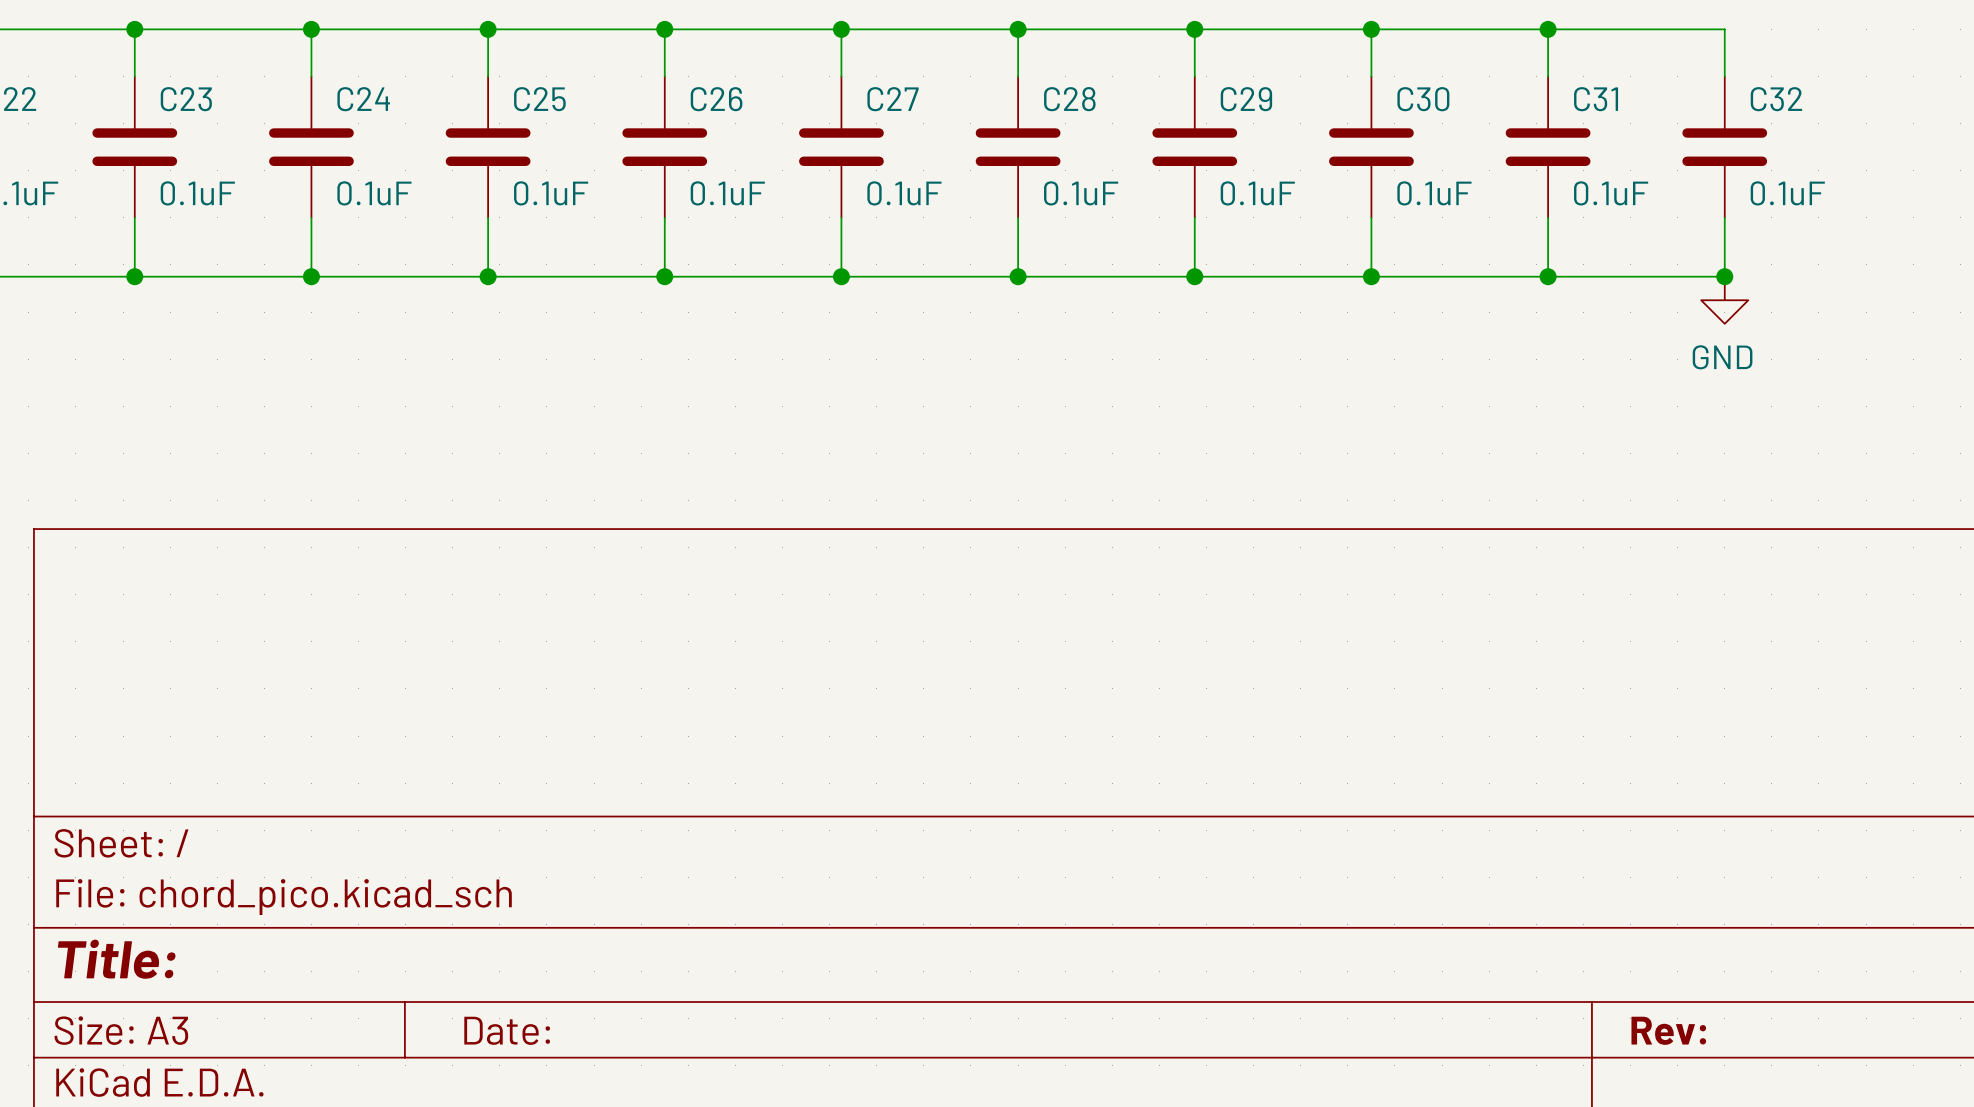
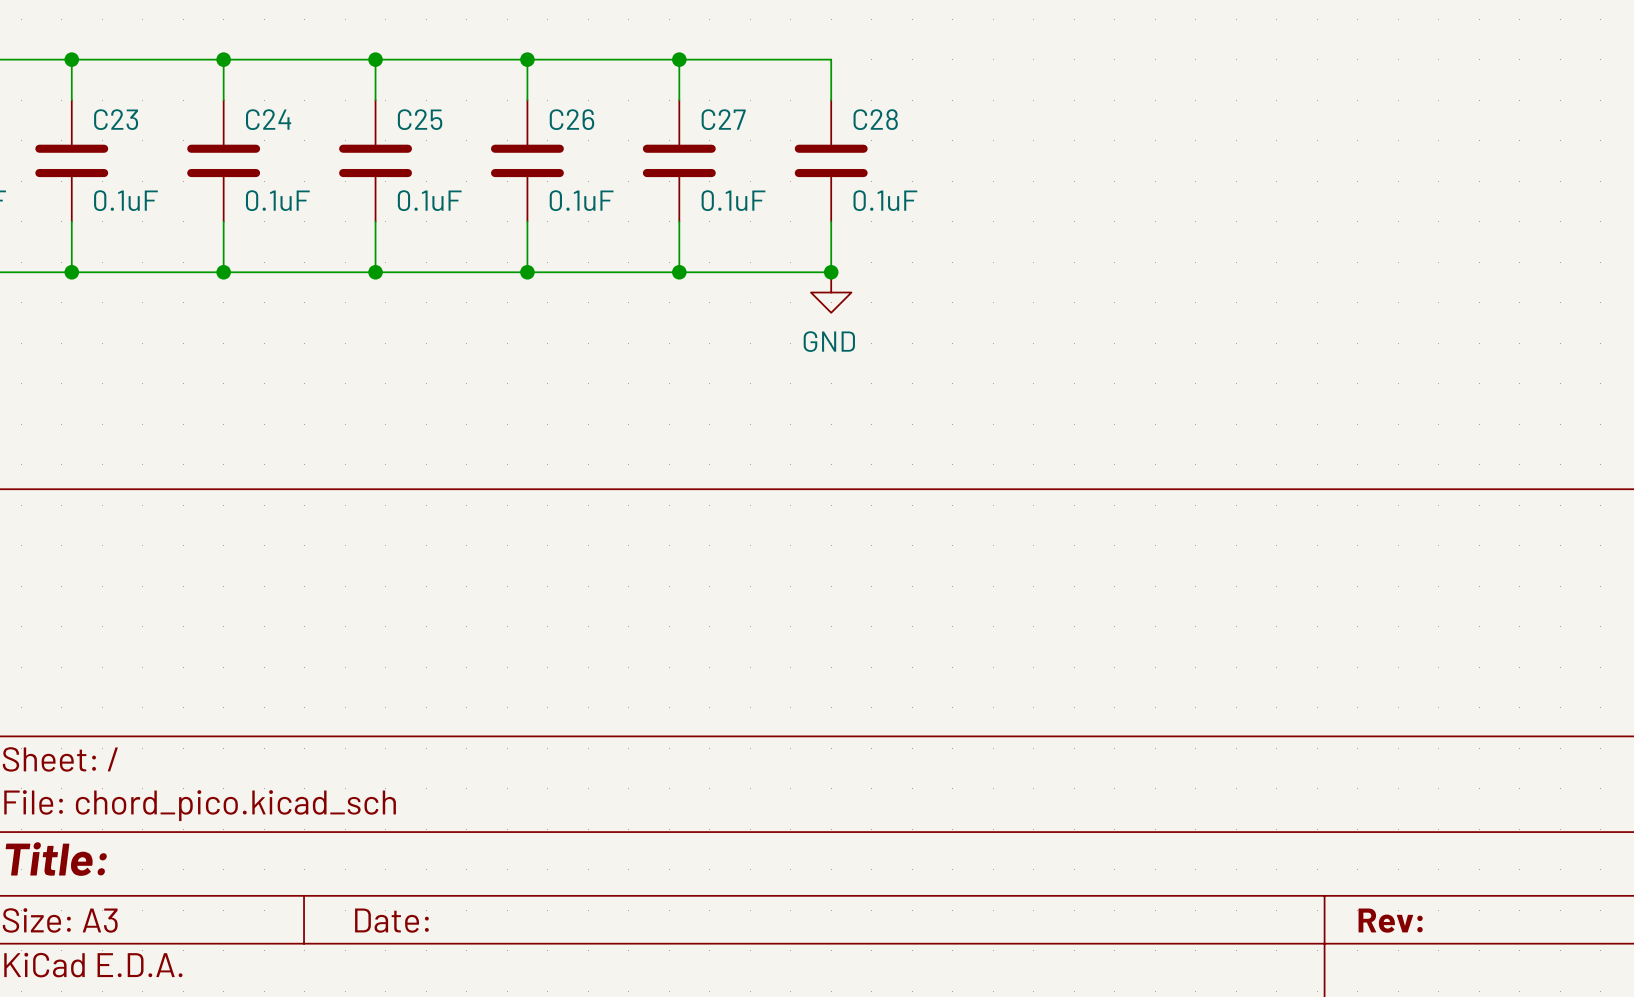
wire: (1018, 29) (1724, 29) (1724, 76) -> none
junction: (1018, 29) -> none
wire: (1194, 29) (1194, 76) -> none
junction: (1194, 29) -> none
wire: (1371, 29) (1371, 76) -> none
junction: (1371, 29) -> none
wire: (1548, 29) (1548, 76) -> none
junction: (1548, 29) -> none
C29: 0.1uF (1194, 147) -> none
C30: 0.1uF (1371, 147) -> none
C31: 0.1uF (1548, 147) -> none
C32: 0.1uF (1724, 147) -> none
wire: (1194, 217) (1194, 276) -> none
wire: (1371, 217) (1371, 276) -> none
wire: (1548, 217) (1548, 276) -> none
wire: (1724, 217) (1724, 276) (1018, 276) -> none
junction: (1194, 276) -> none
junction: (1371, 276) -> none
junction: (1548, 276) -> none
junction: (1724, 276) -> none
power symbol: none -> GND (831, 292)
power symbol: GND (1724, 300) -> none

